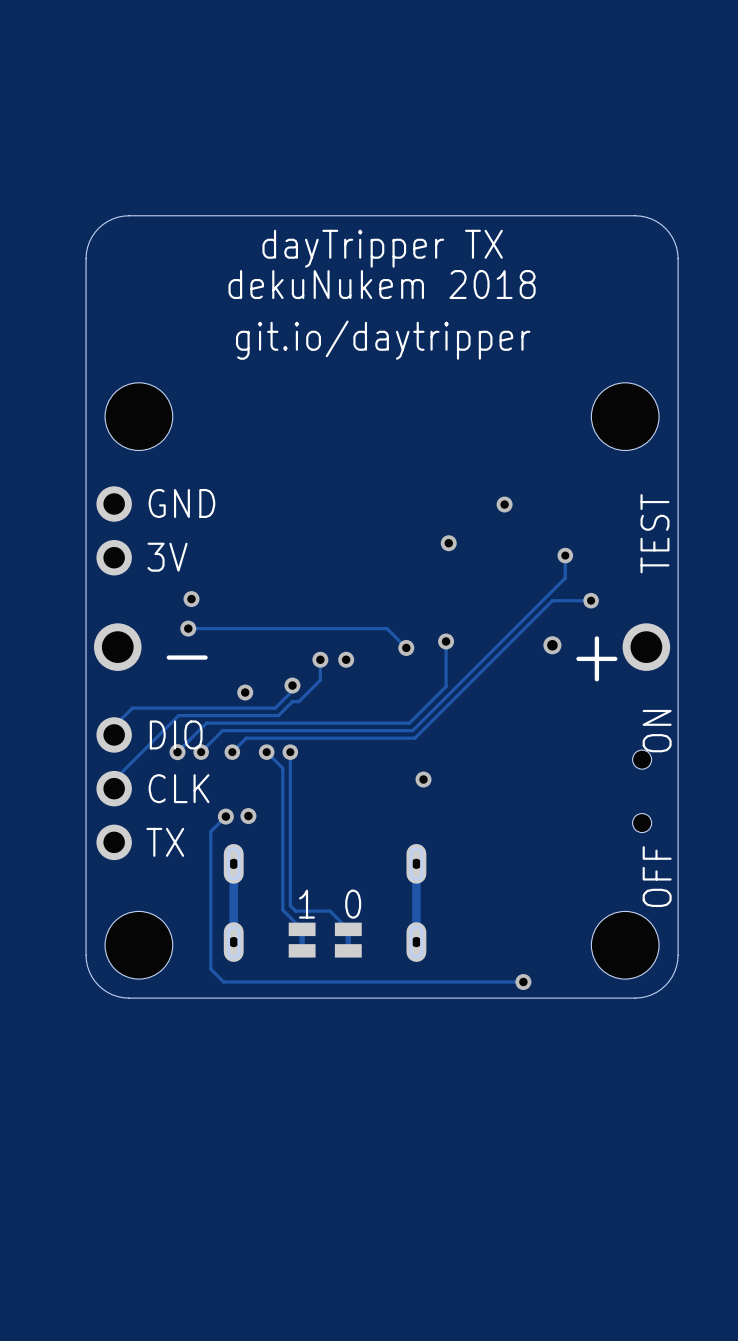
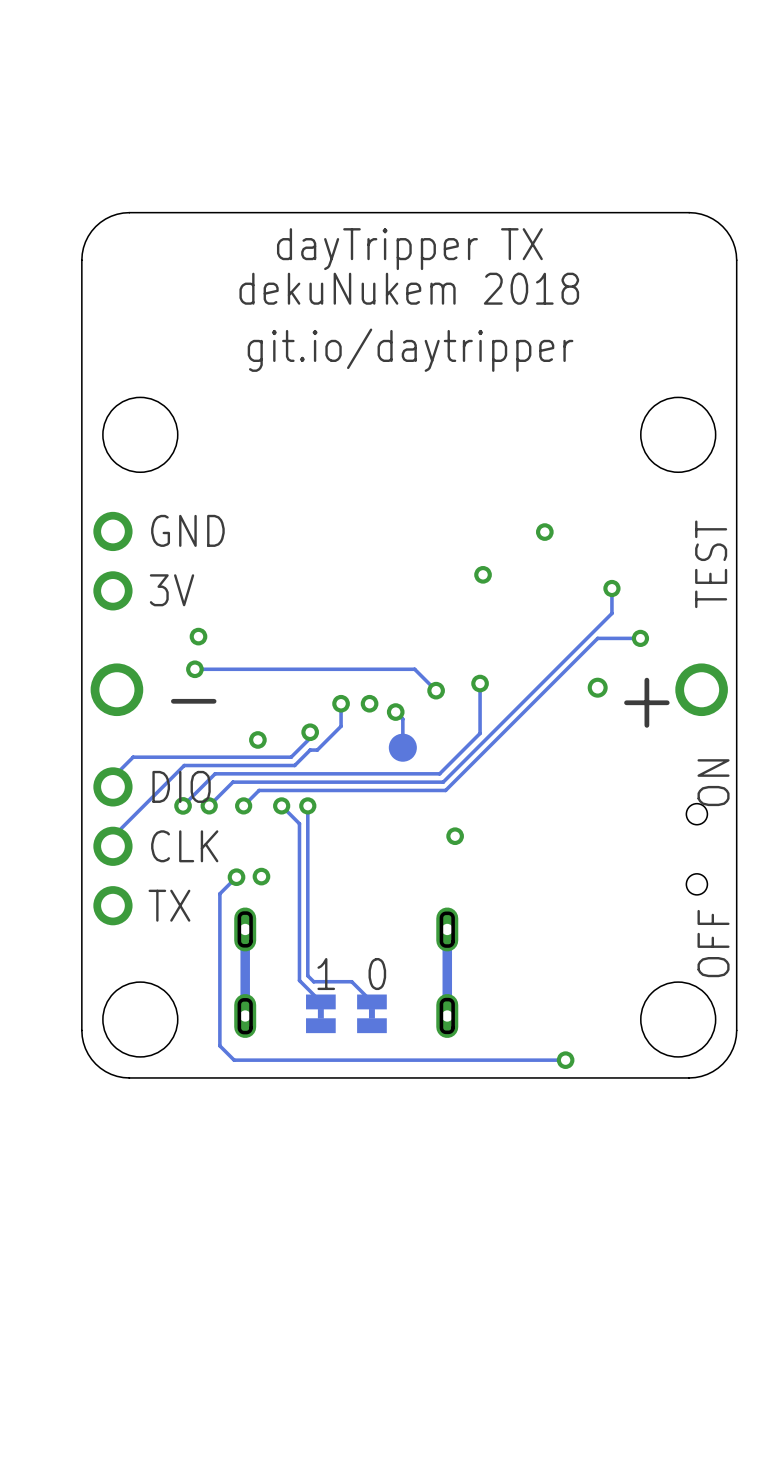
track: none -> (395, 712) (402, 719) (402, 747)
via: none -> (395, 712)
part: none -> (402, 747)

